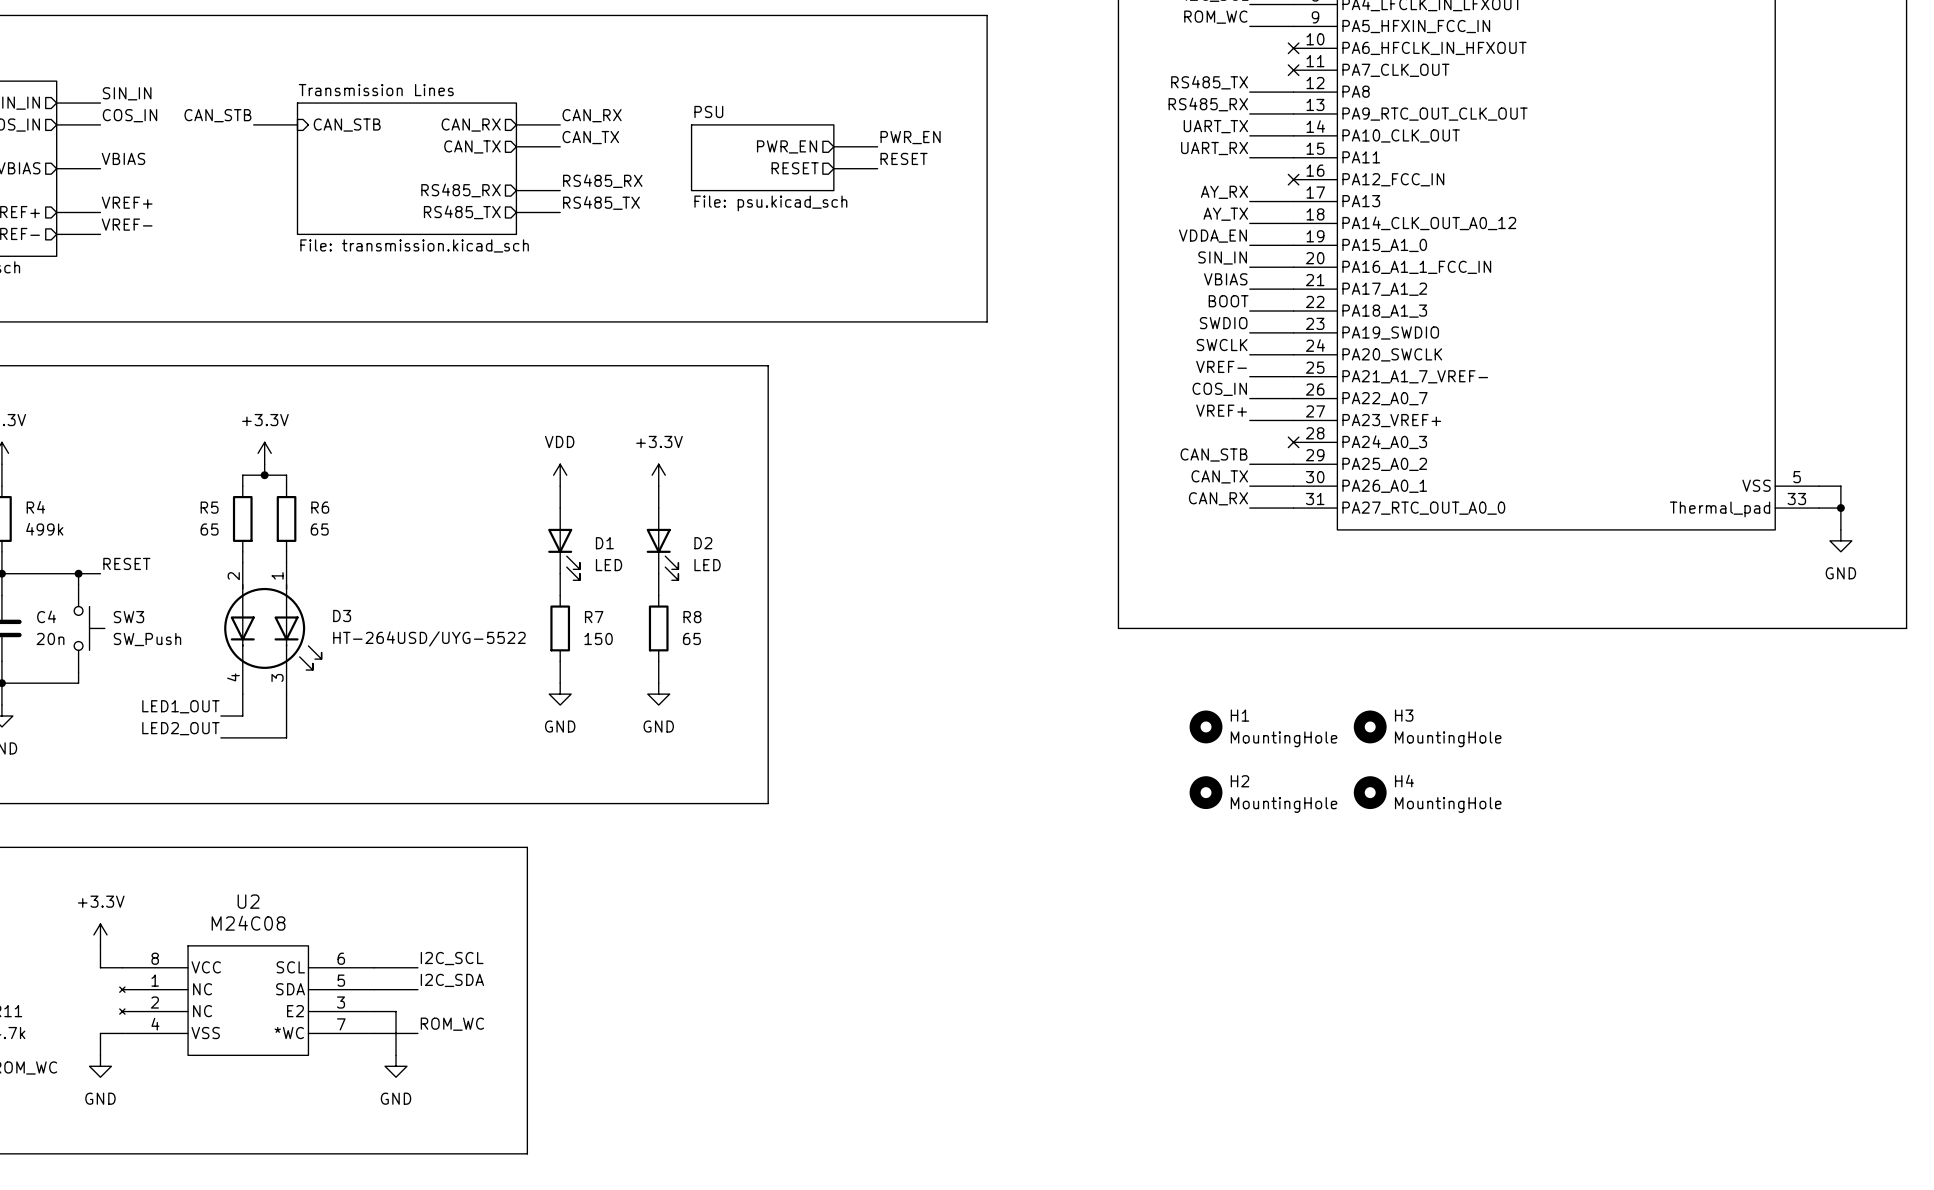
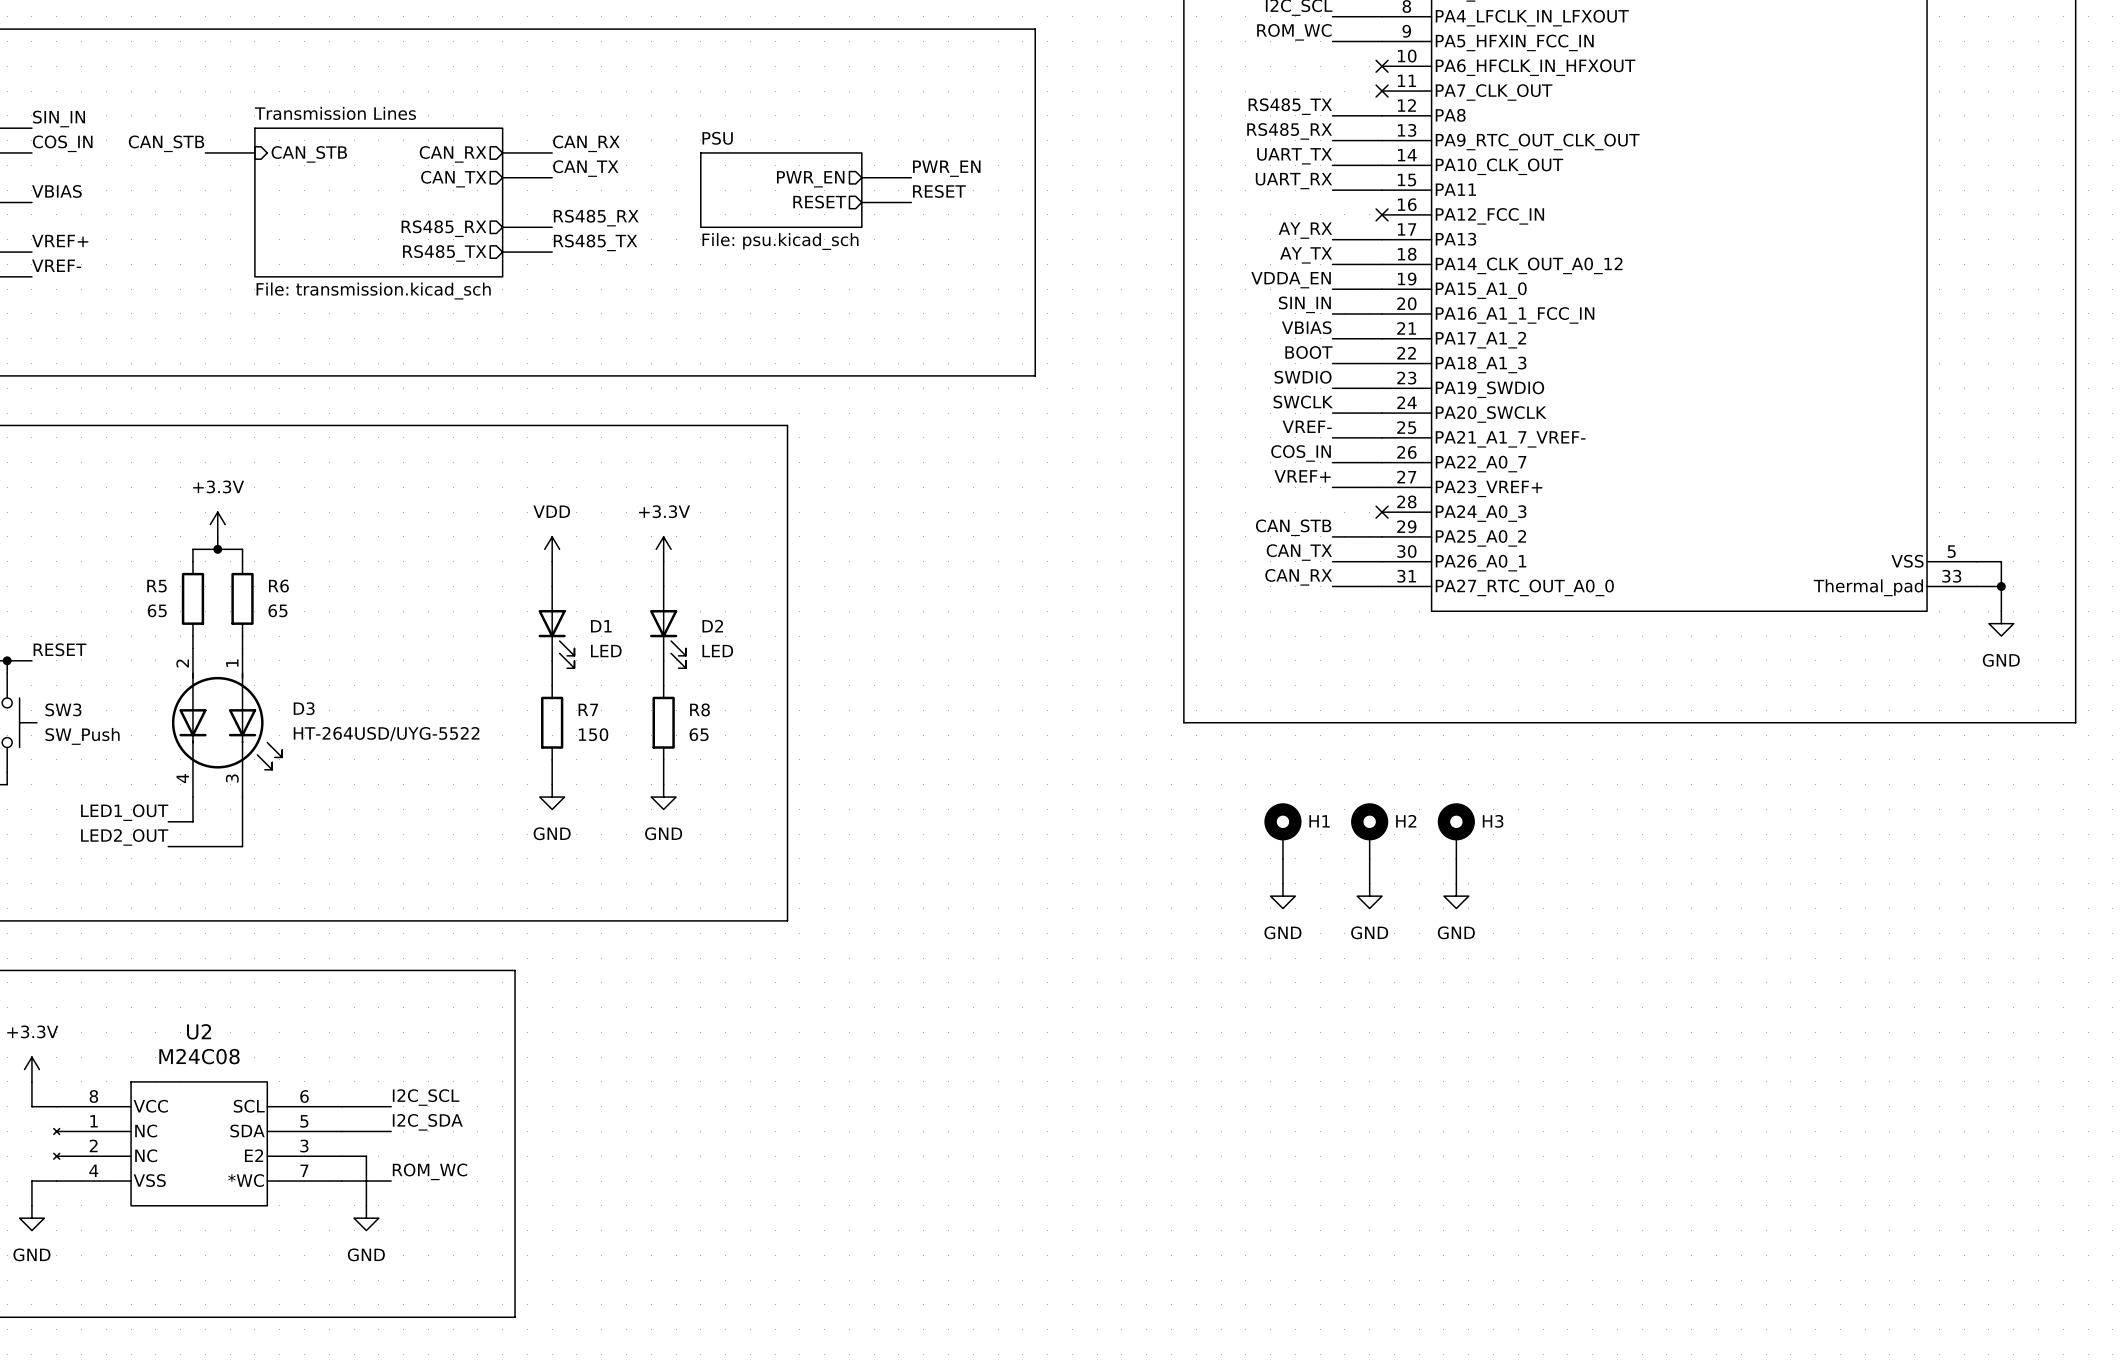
H1 symbol: [1189, 710, 1223, 744] -> [1264, 803, 1302, 859]
H3 symbol: [1353, 710, 1387, 744] -> [1437, 803, 1475, 859]
H1 value: MountingHole (1284, 739) -> none
H3 value: MountingHole (1448, 739) -> none
wire: none -> (1282, 858) (1282, 883)
wire: none -> (1369, 858) (1369, 883)
wire: none -> (1456, 858) (1456, 883)
H2 symbol: [1189, 776, 1223, 810] -> [1351, 803, 1389, 859]
power symbol: none -> GND (1282, 896)
power symbol: none -> GND (1369, 896)
power symbol: none -> GND (1456, 896)
H4: MountingHole (1370, 792) -> none
H2 value: MountingHole (1284, 804) -> none

